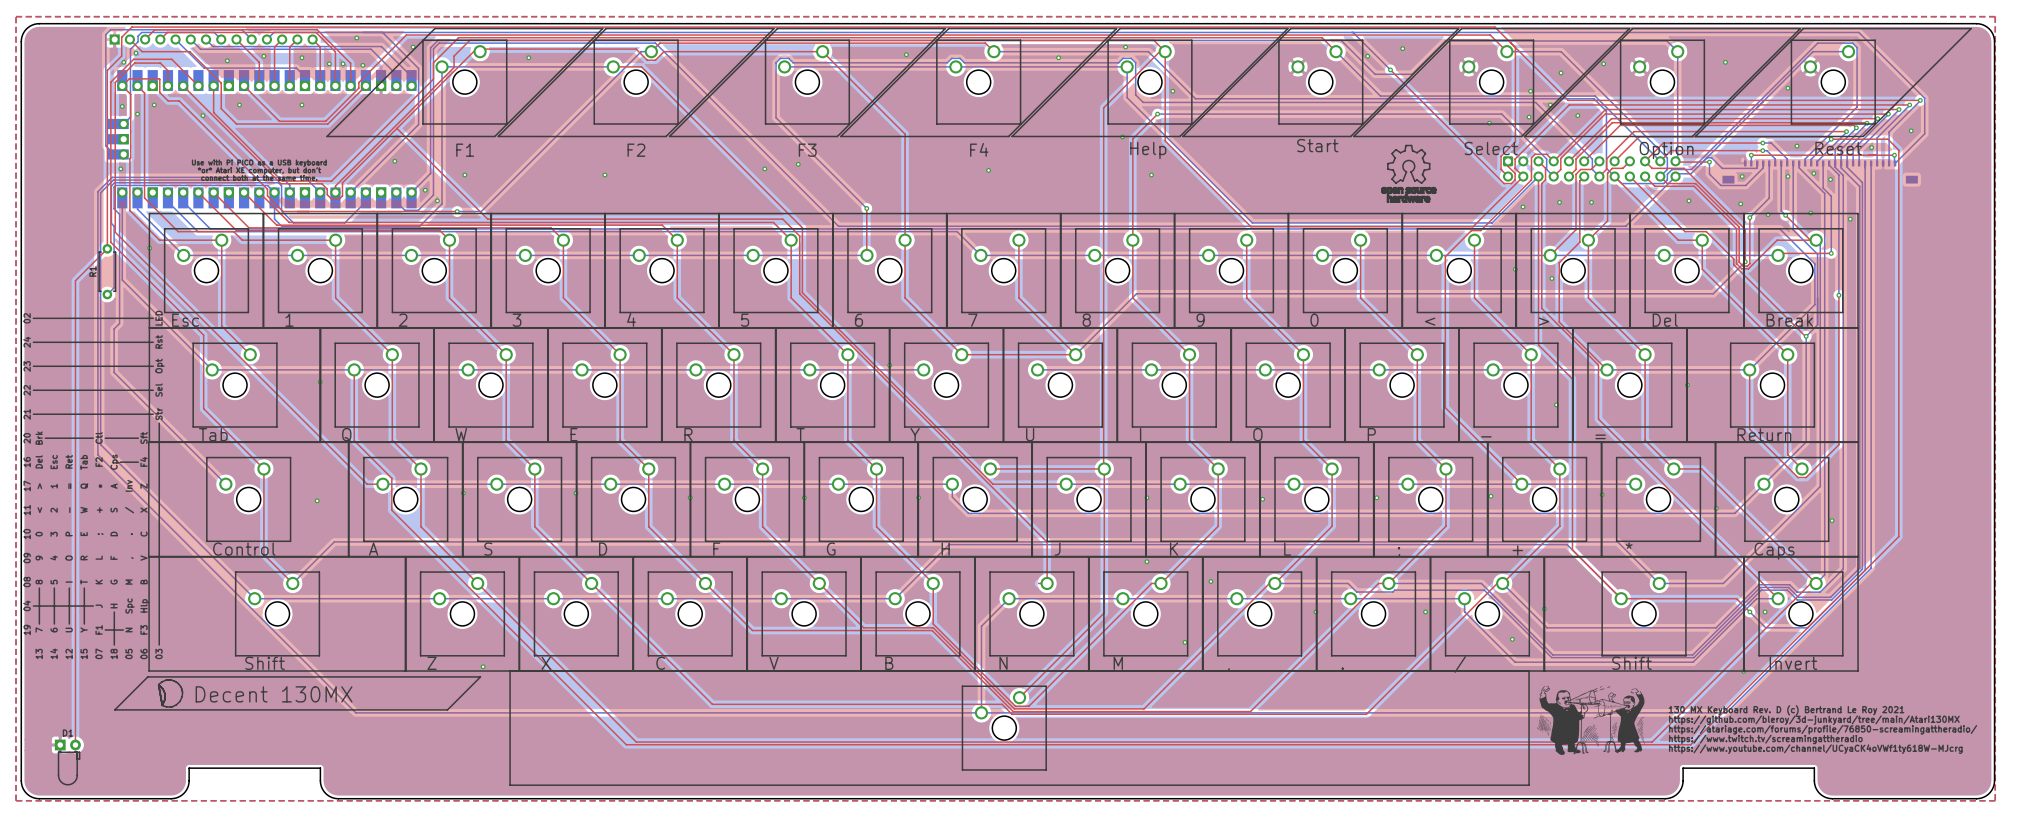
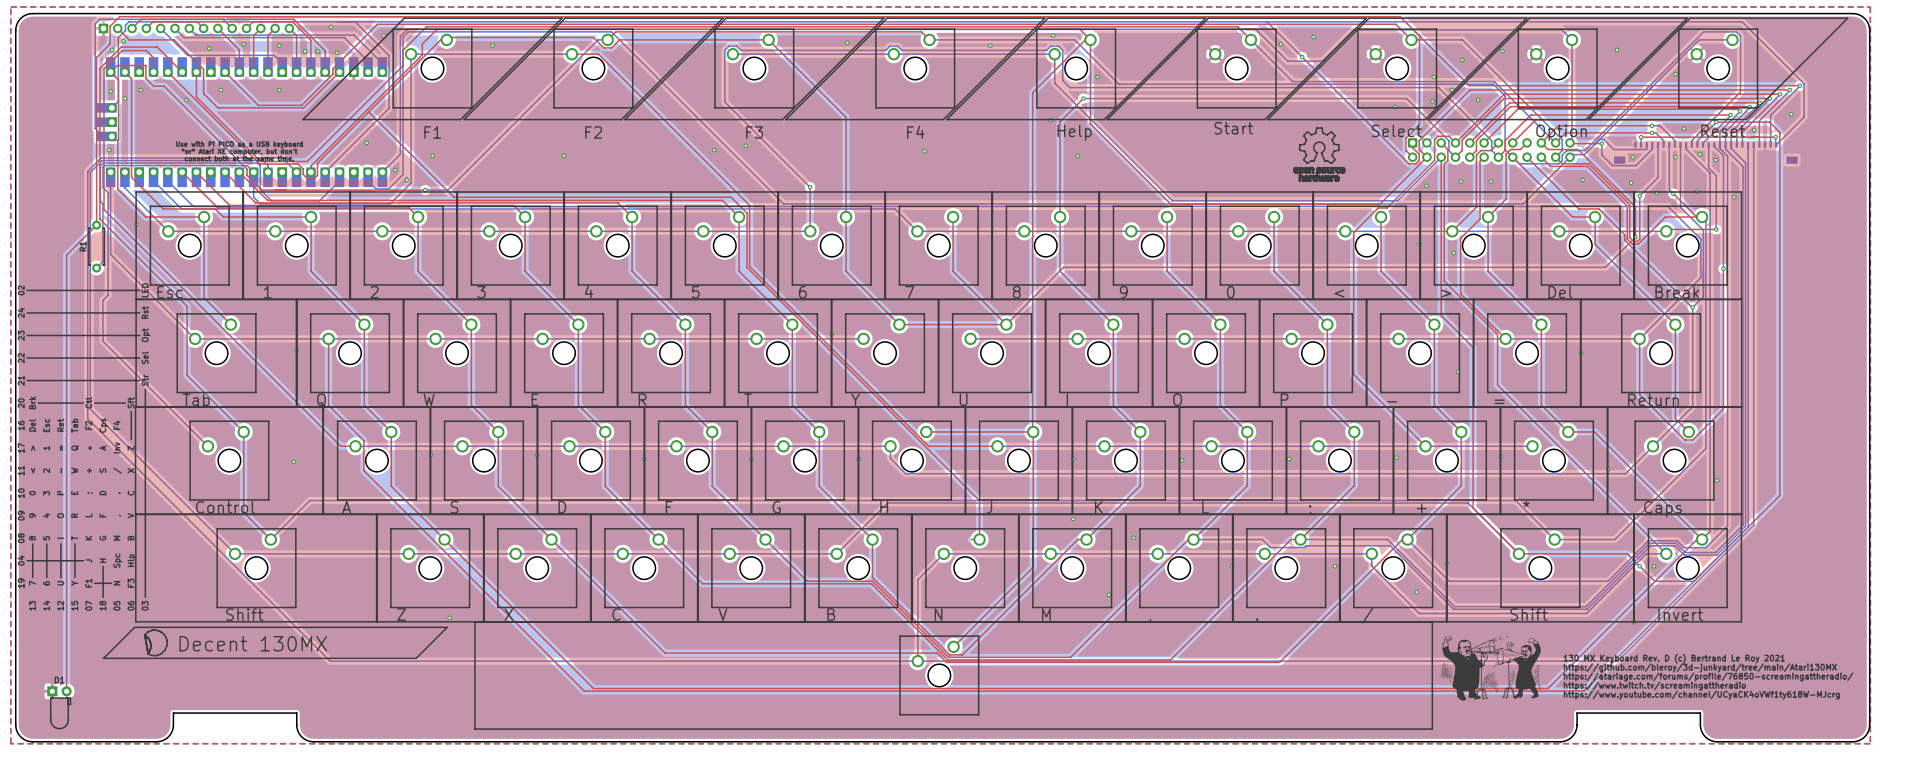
drawing shape: [23, 310, 165, 660] -> [17, 283, 151, 611]

